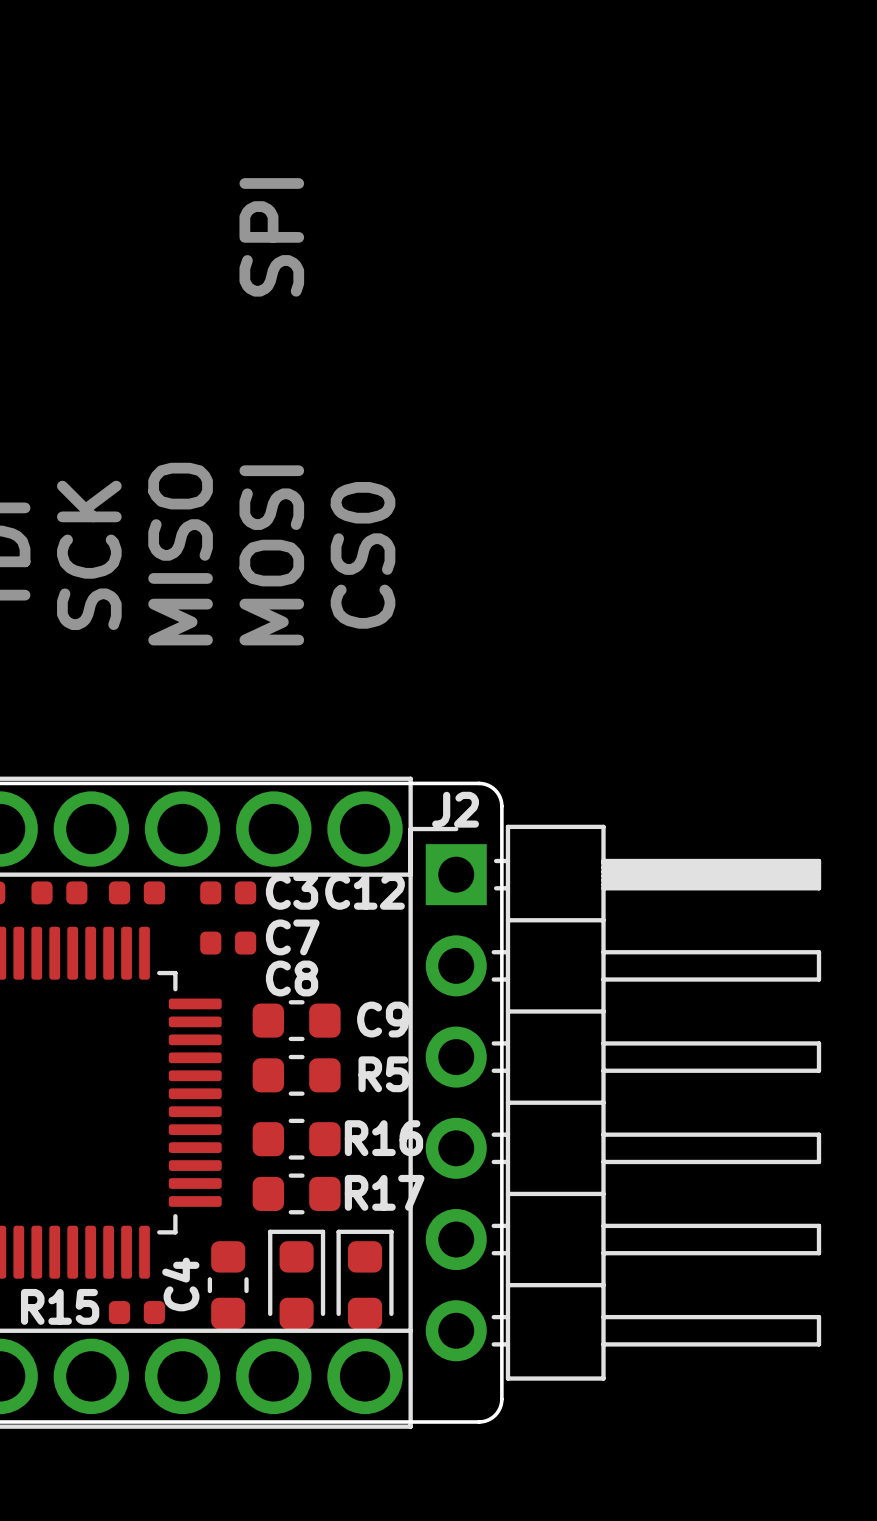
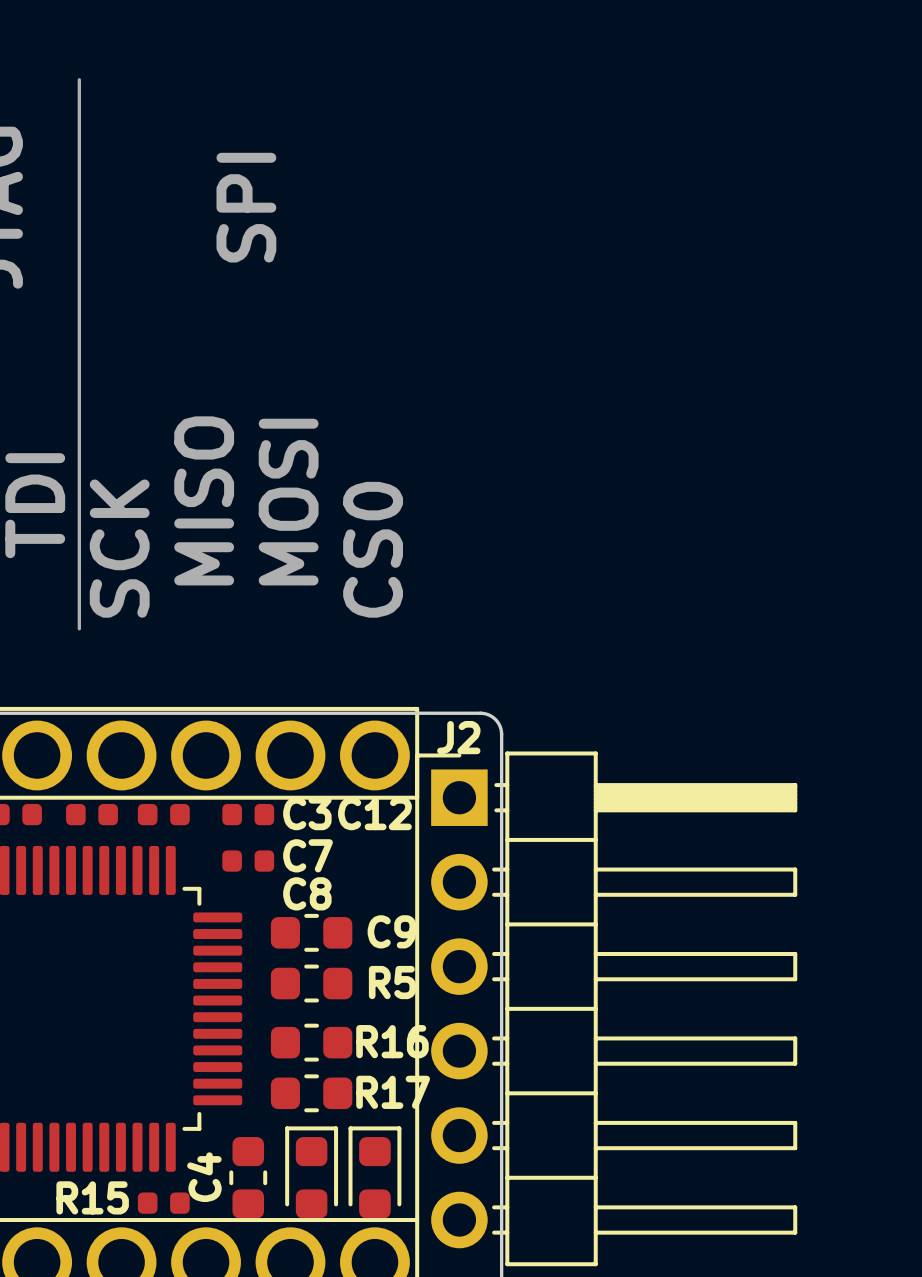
line: none -> (79, 79) (79, 628)
text position: SPI (271, 237) -> SPI (246, 207)
text position: SCK (89, 555) -> SCK (119, 548)
text position: CS0 (363, 555) -> CS0 (373, 549)

